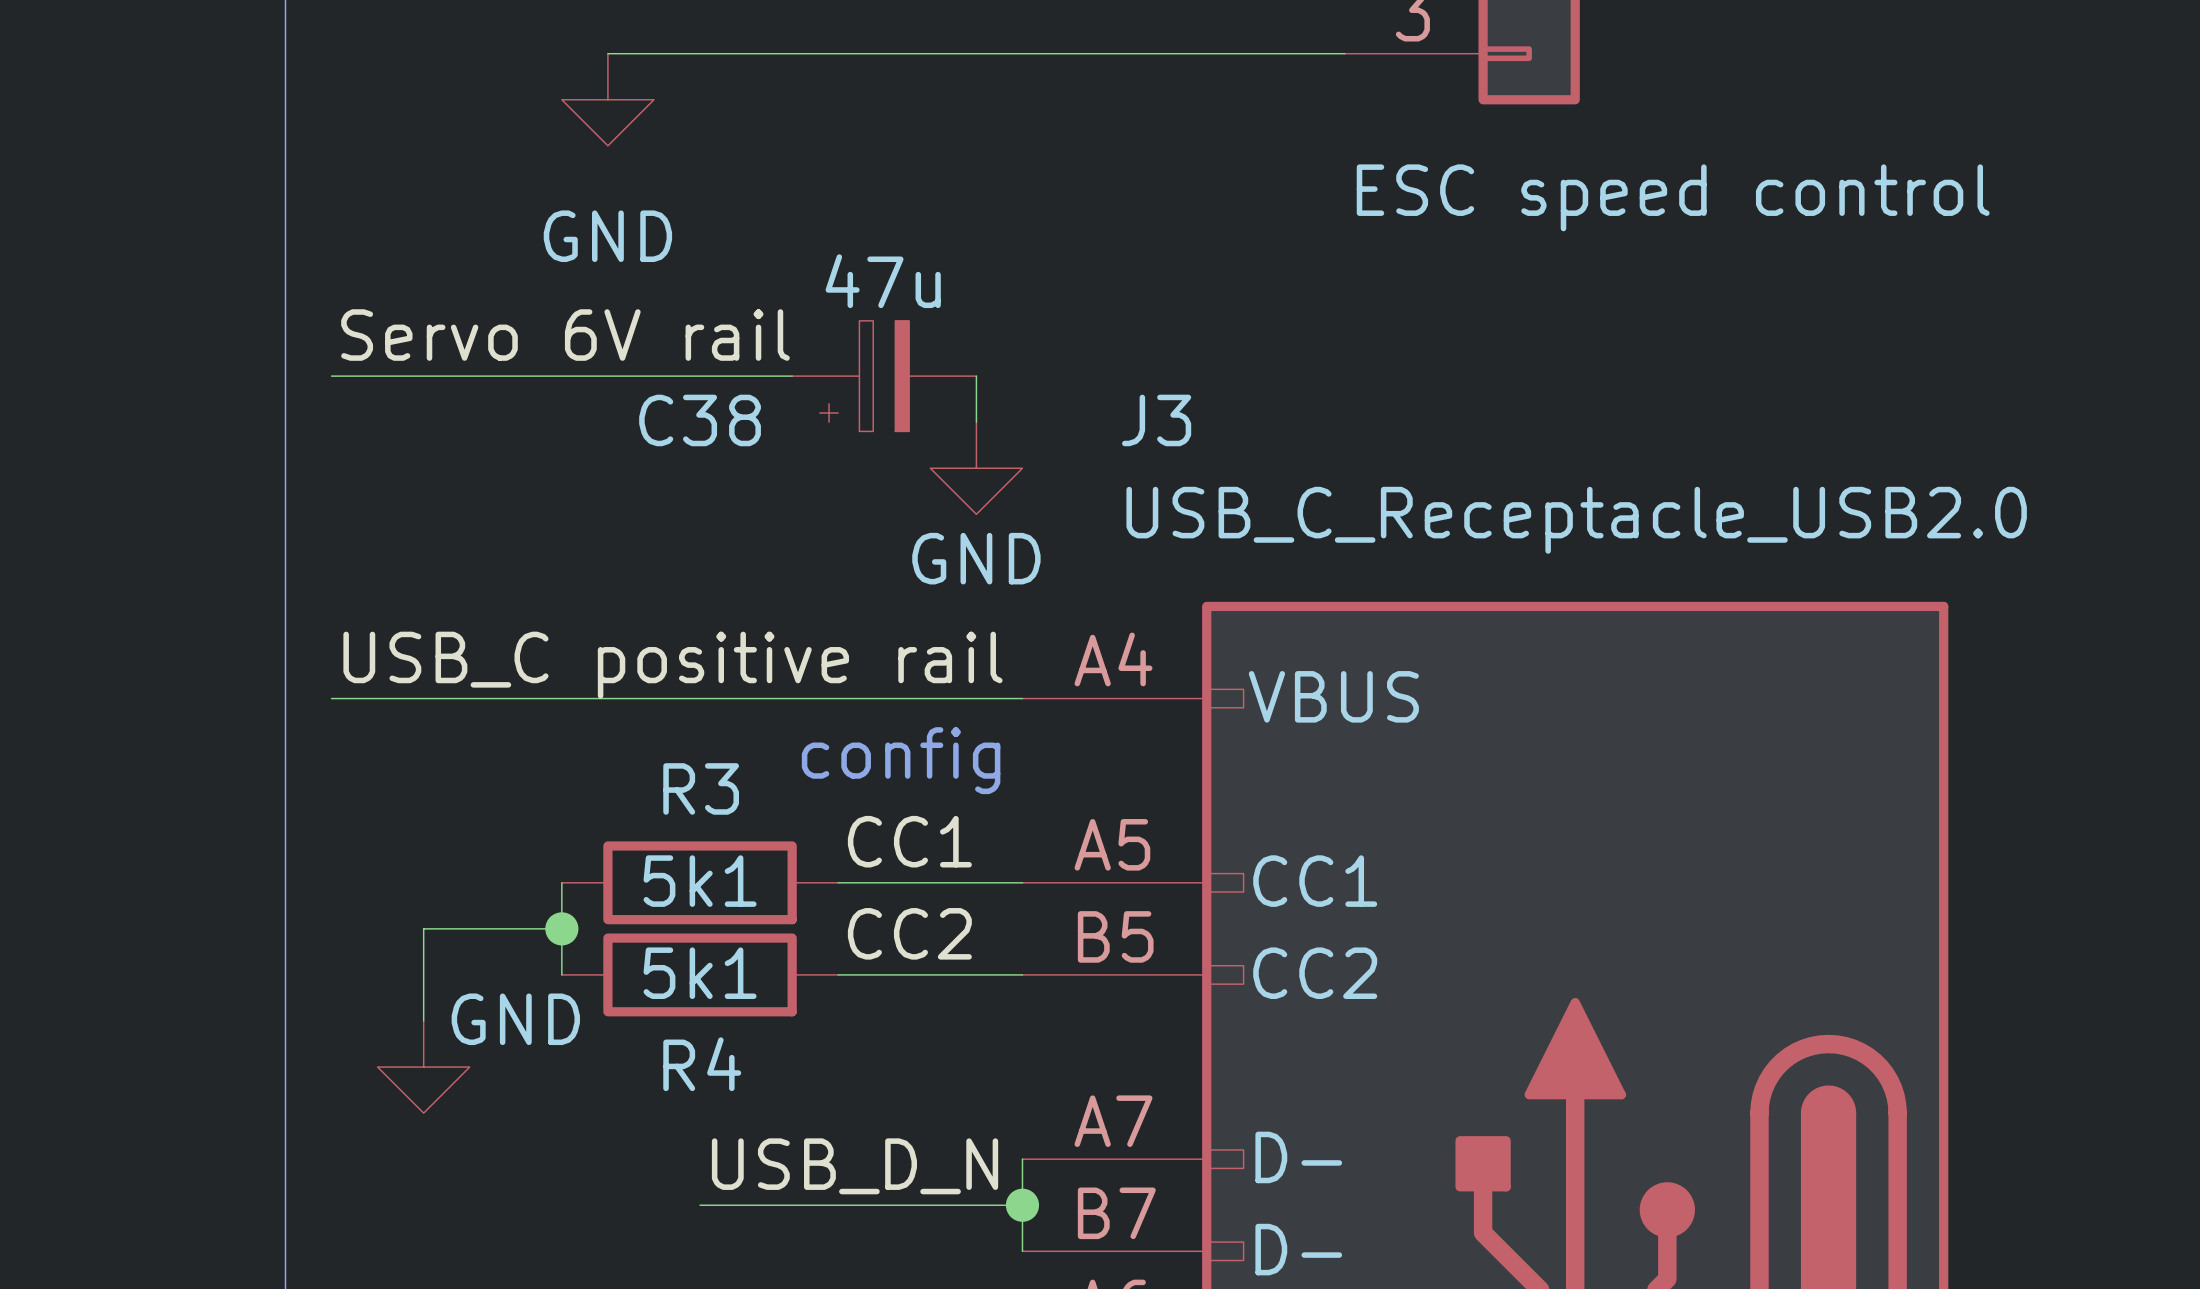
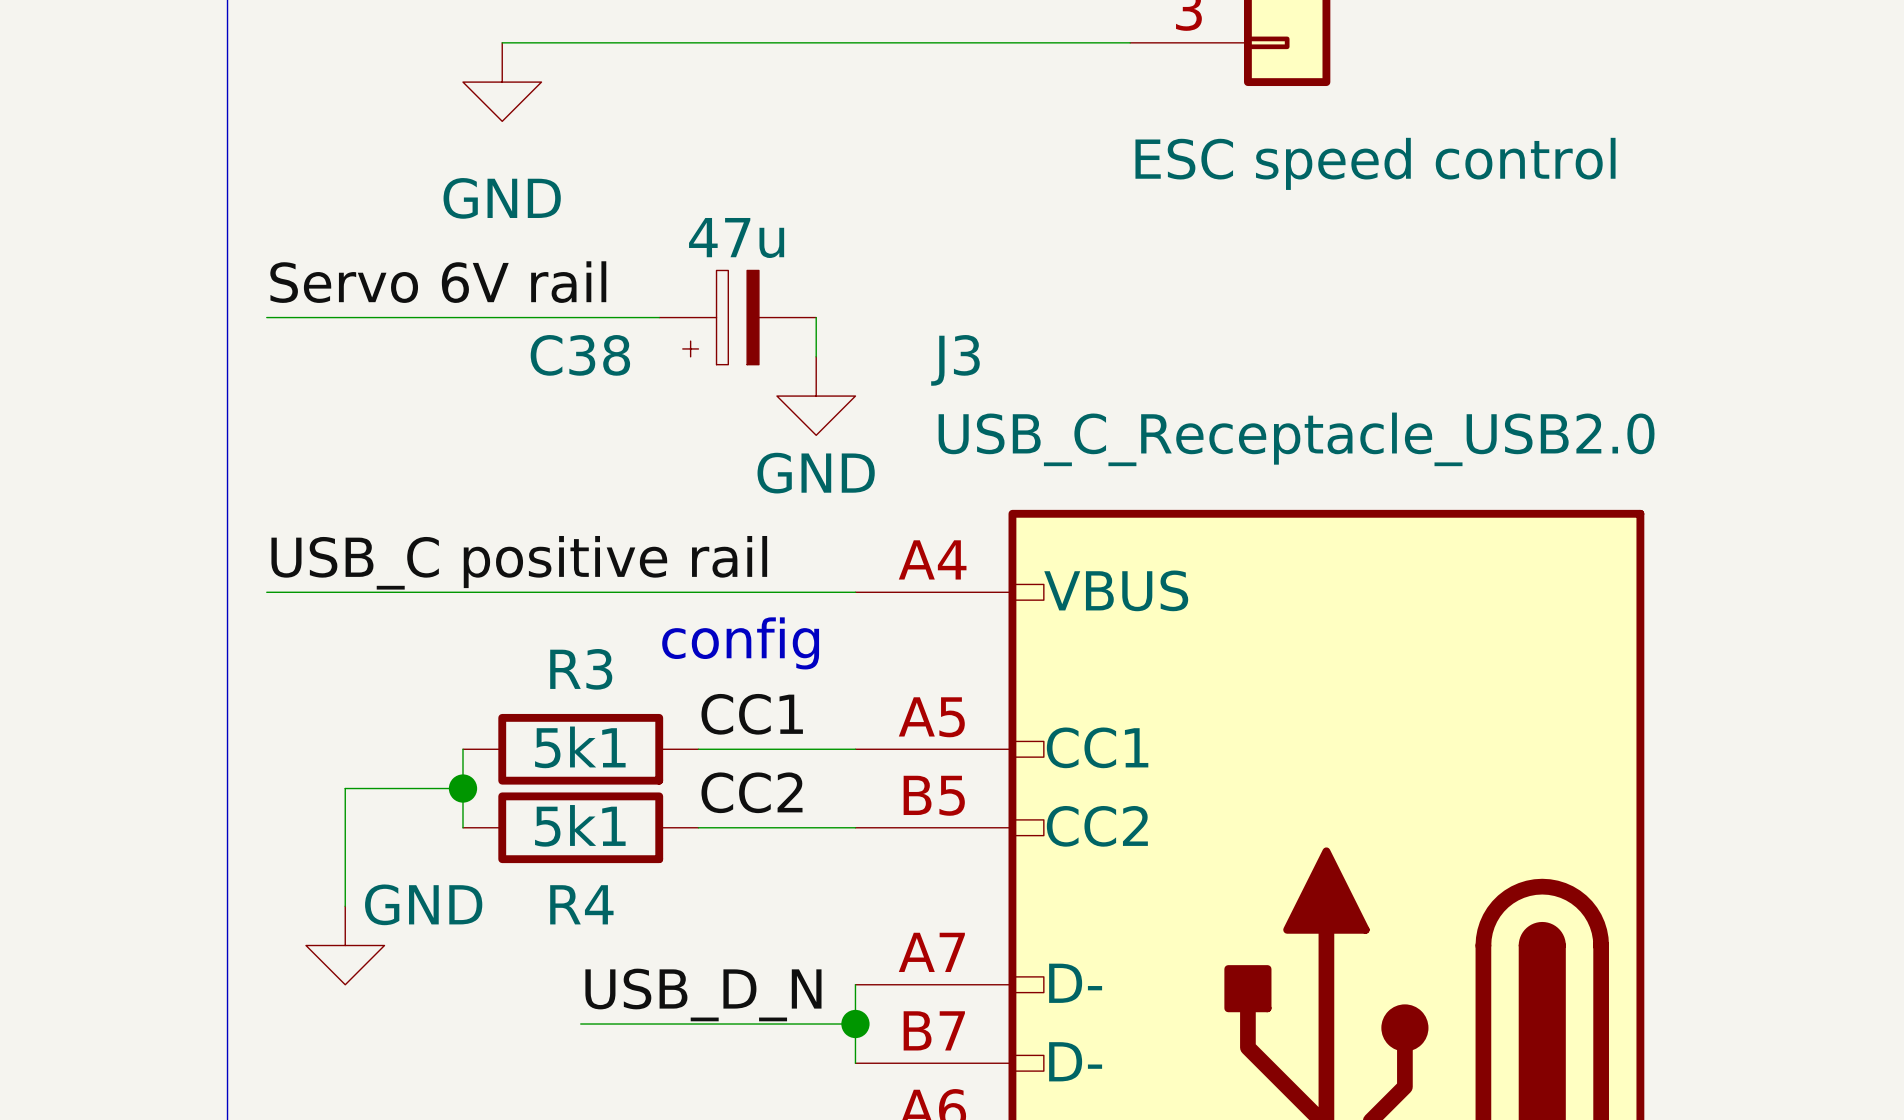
power symbol position: GND (423, 1067) -> GND (345, 945)

